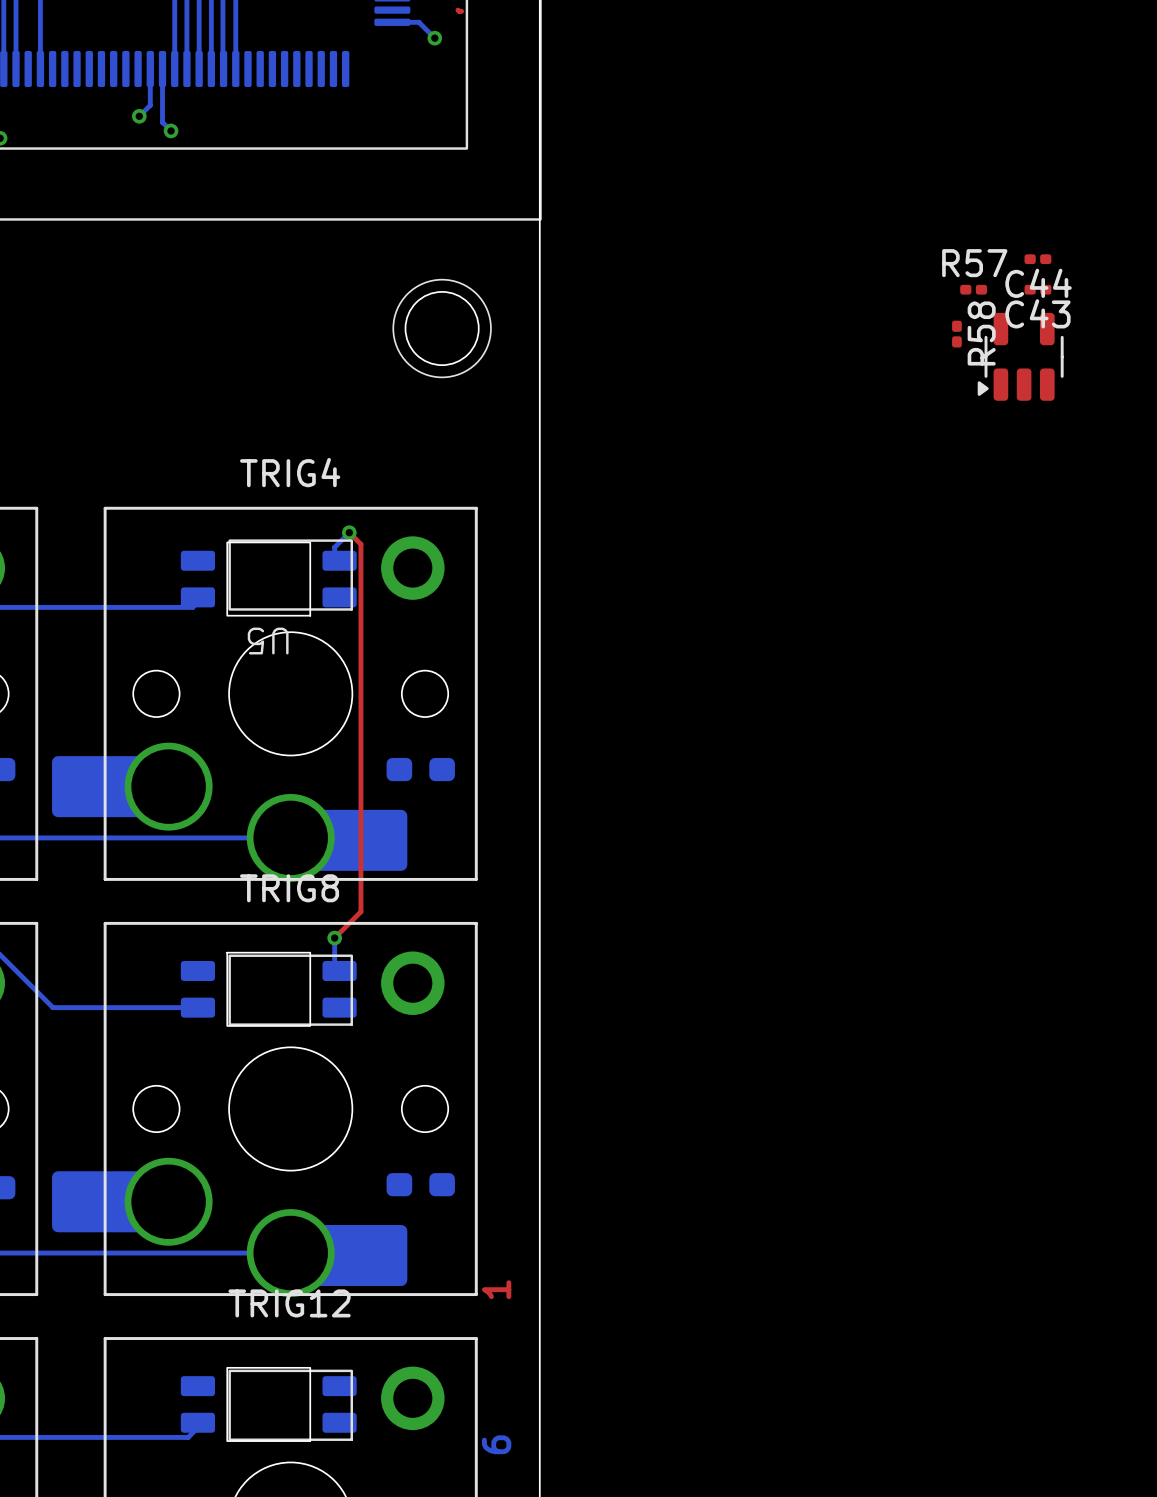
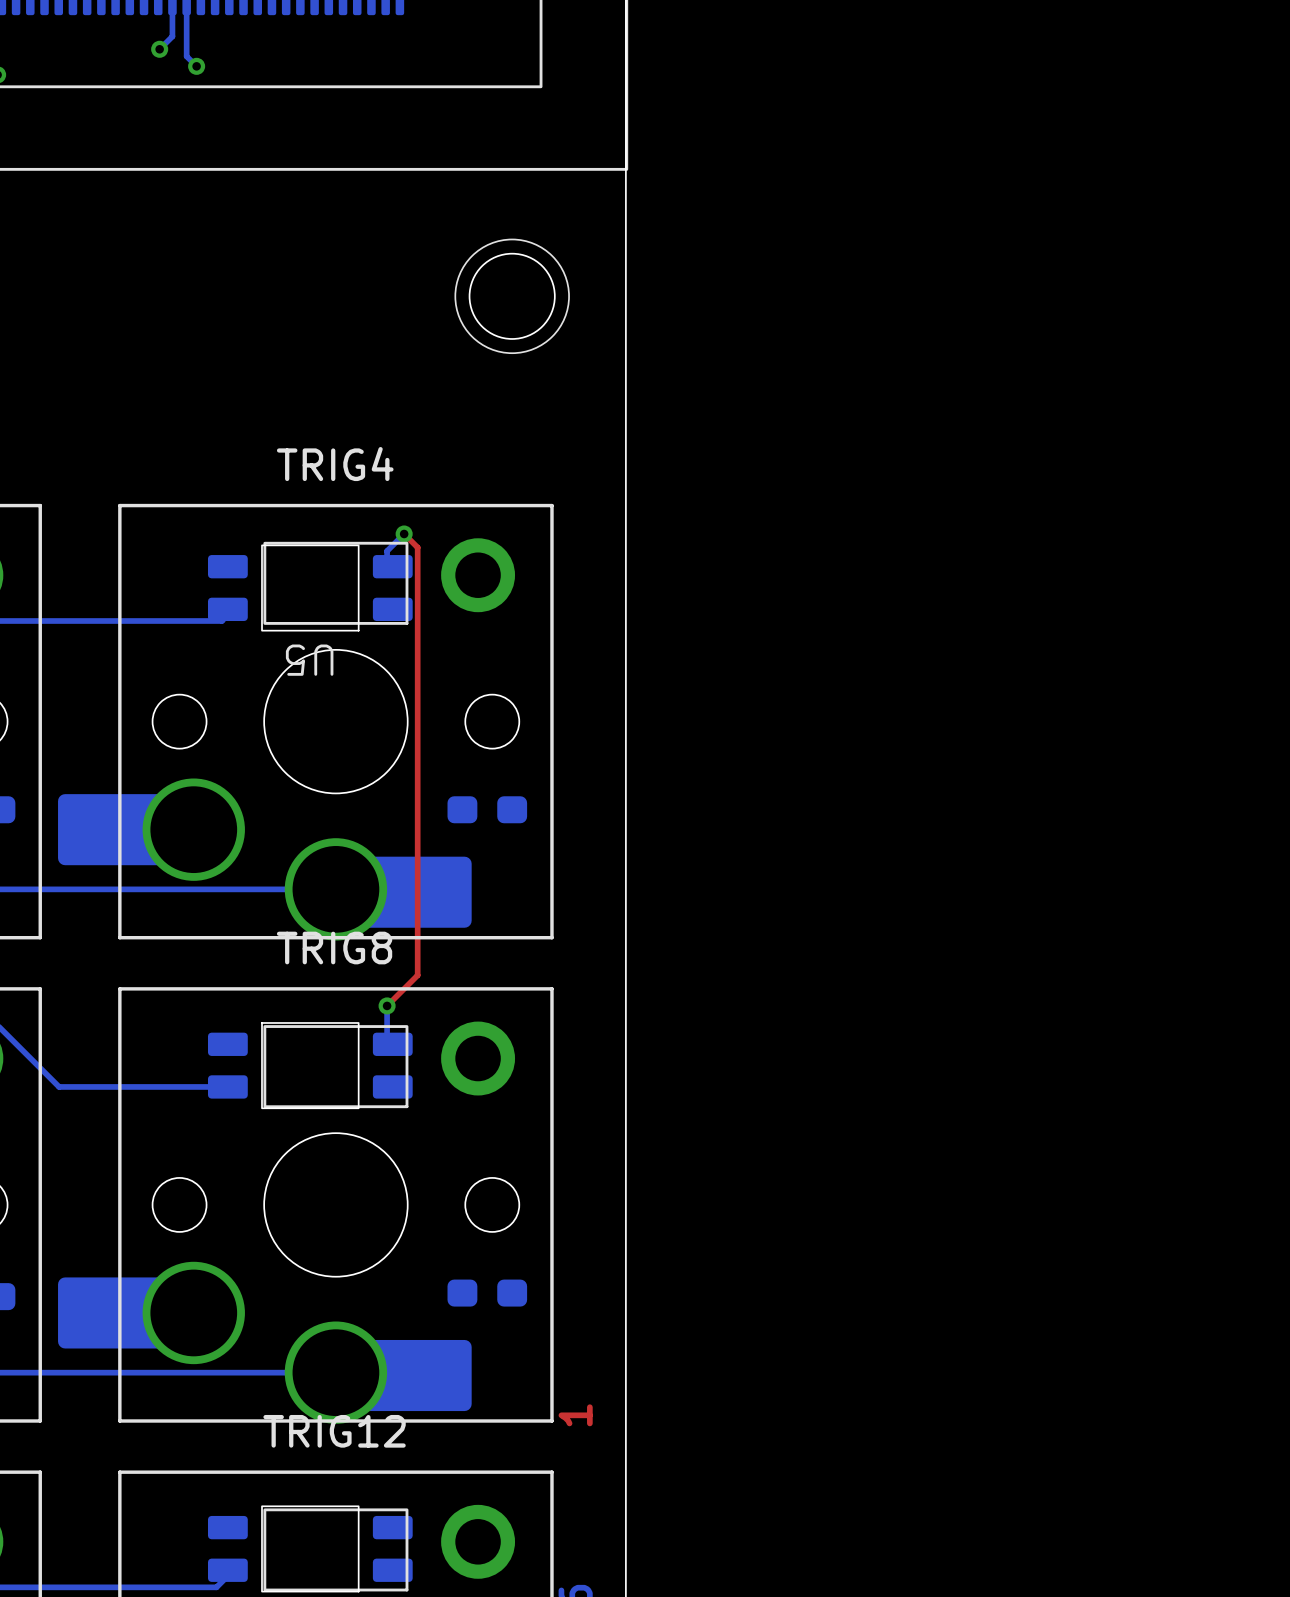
C44: (1037, 259) -> none
R57: (973, 289) -> none
C43: (1037, 289) -> none
R58: (956, 334) -> none
part: (1020, 356) -> none

